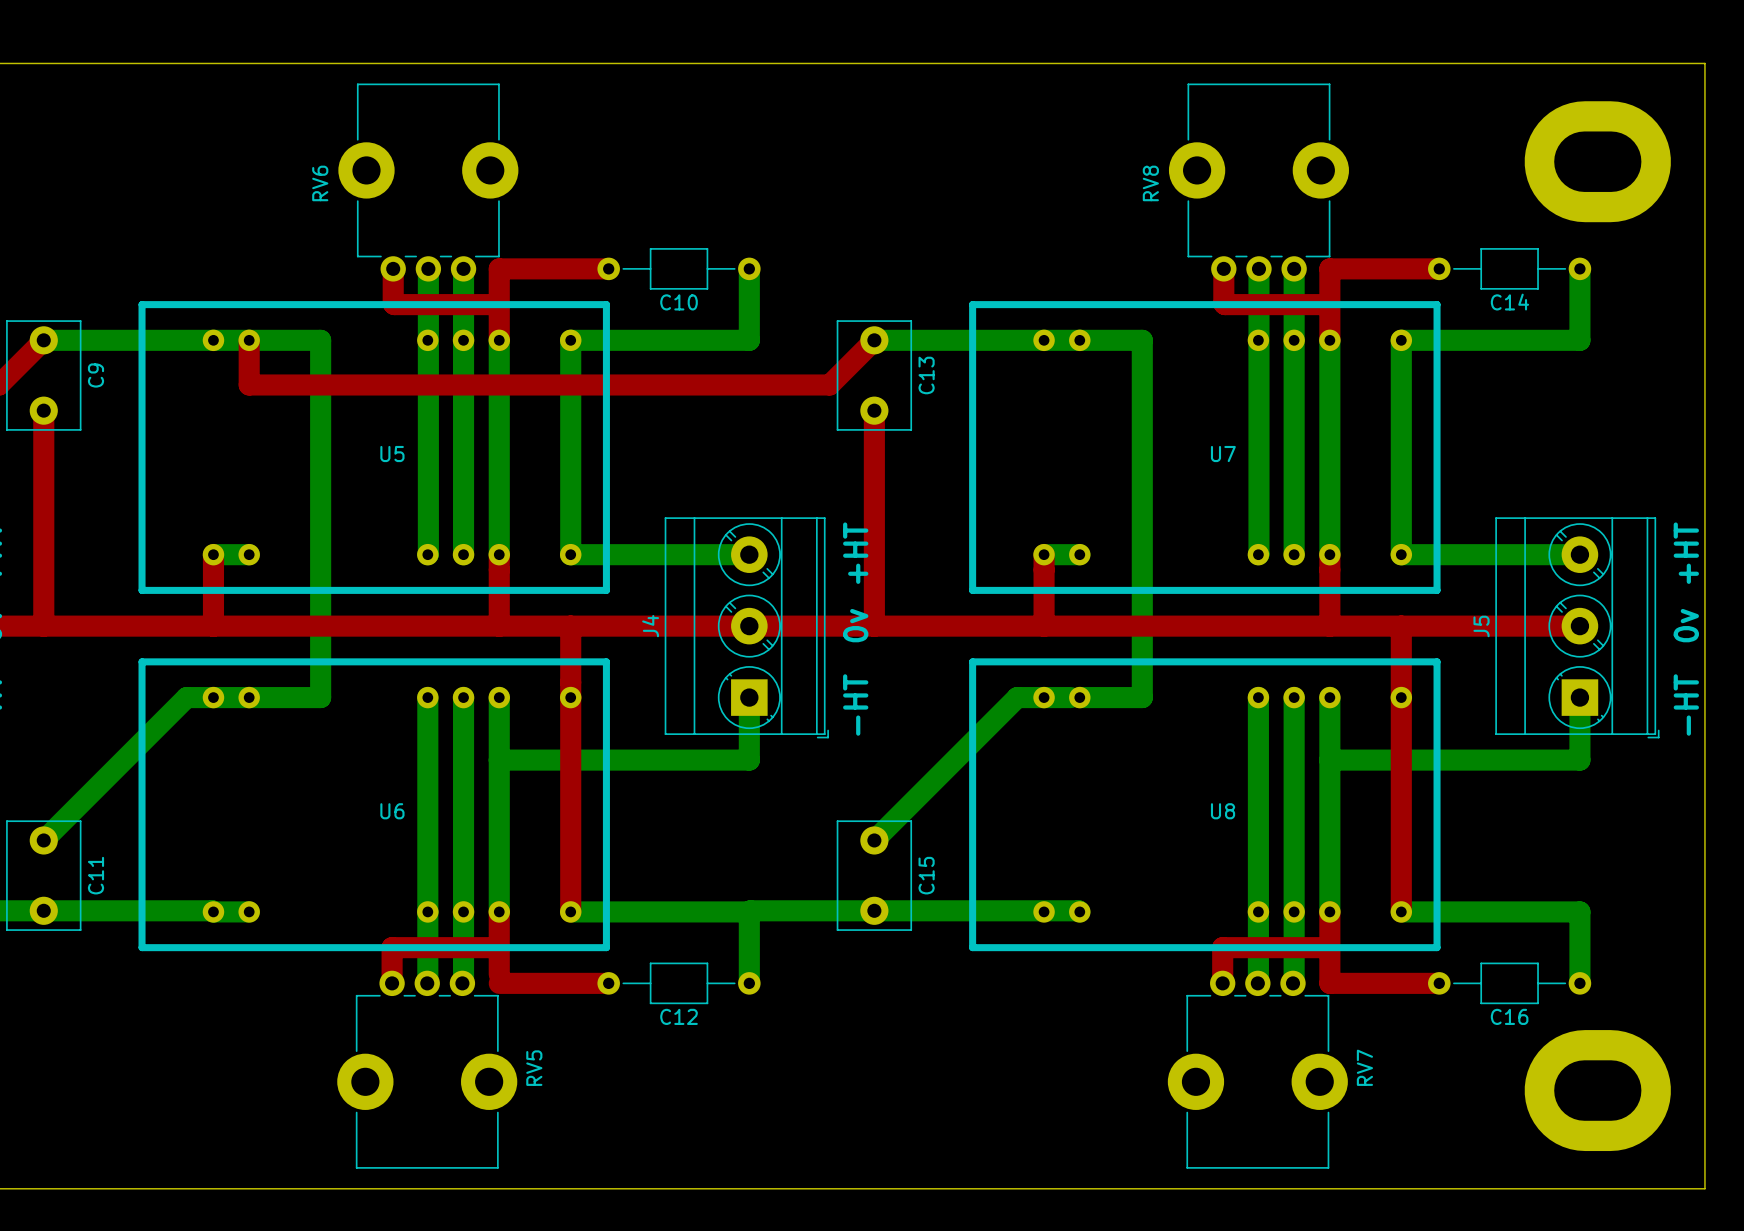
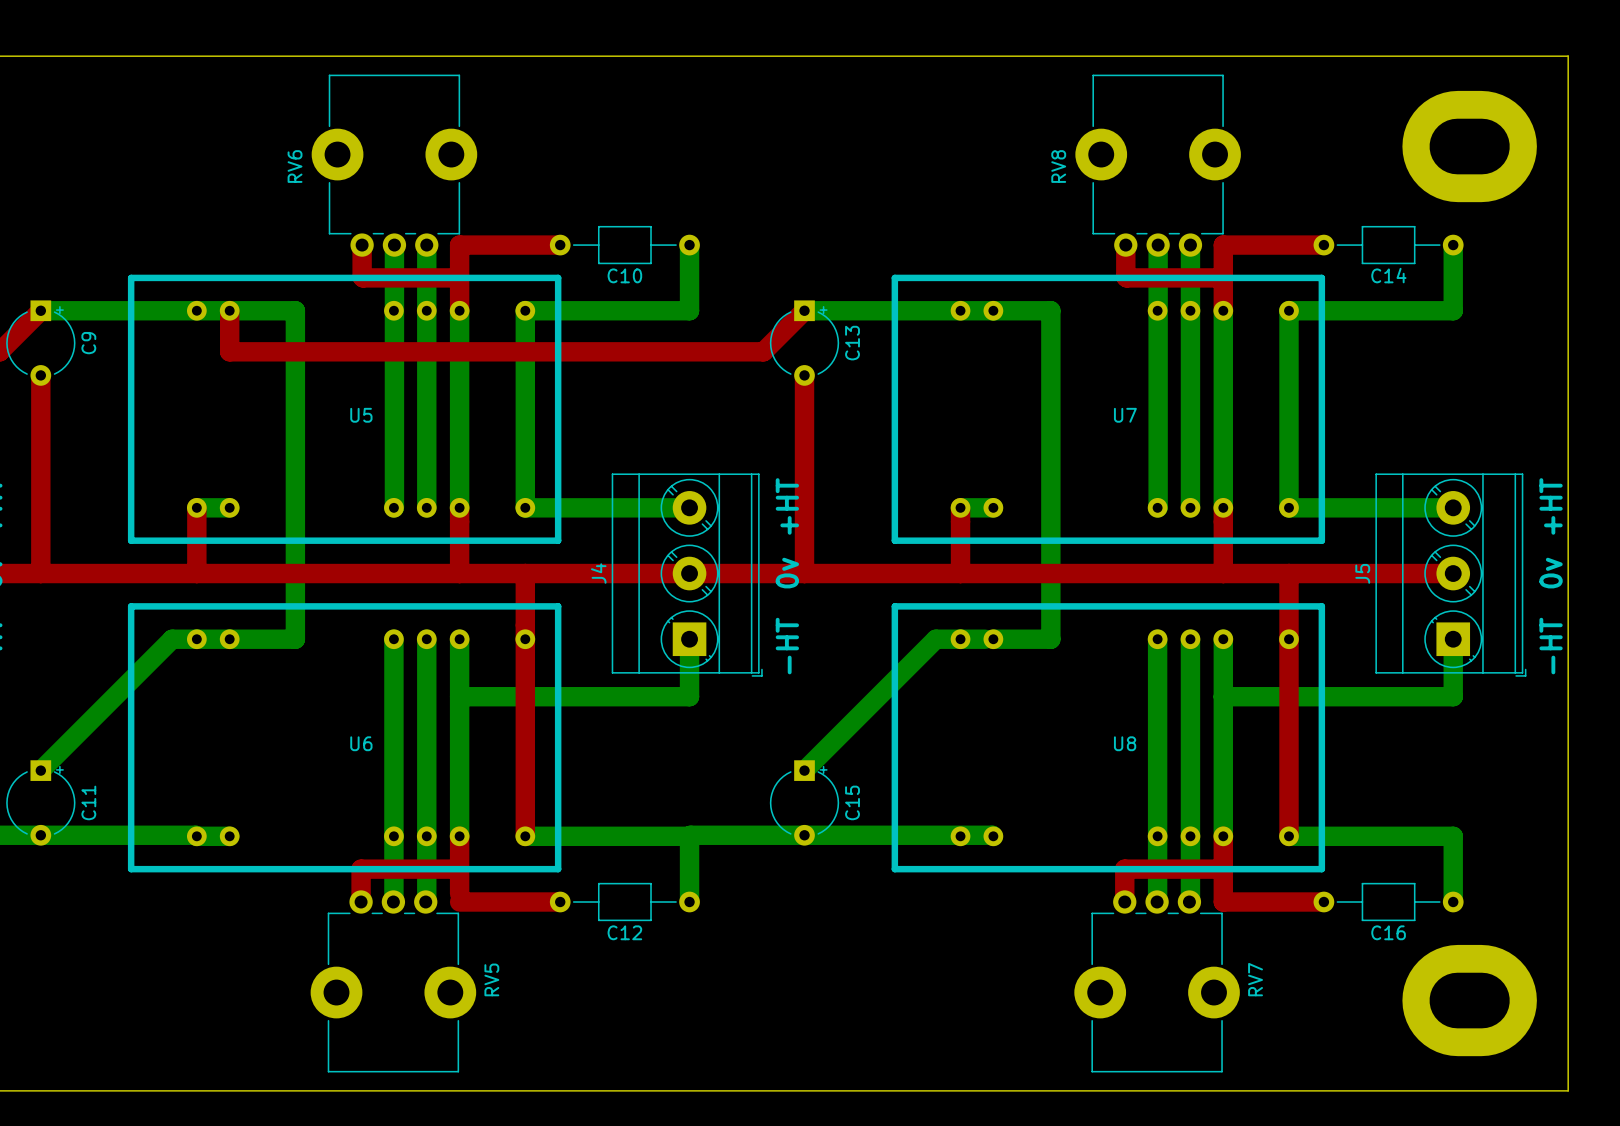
C9 footprint: [6, 320, 82, 431] -> [6, 300, 76, 386]
C13 footprint: [836, 320, 913, 431] -> [769, 300, 840, 386]
C11 footprint: [6, 820, 82, 931] -> [6, 760, 76, 846]
C15 footprint: [836, 820, 913, 931] -> [769, 760, 840, 846]

